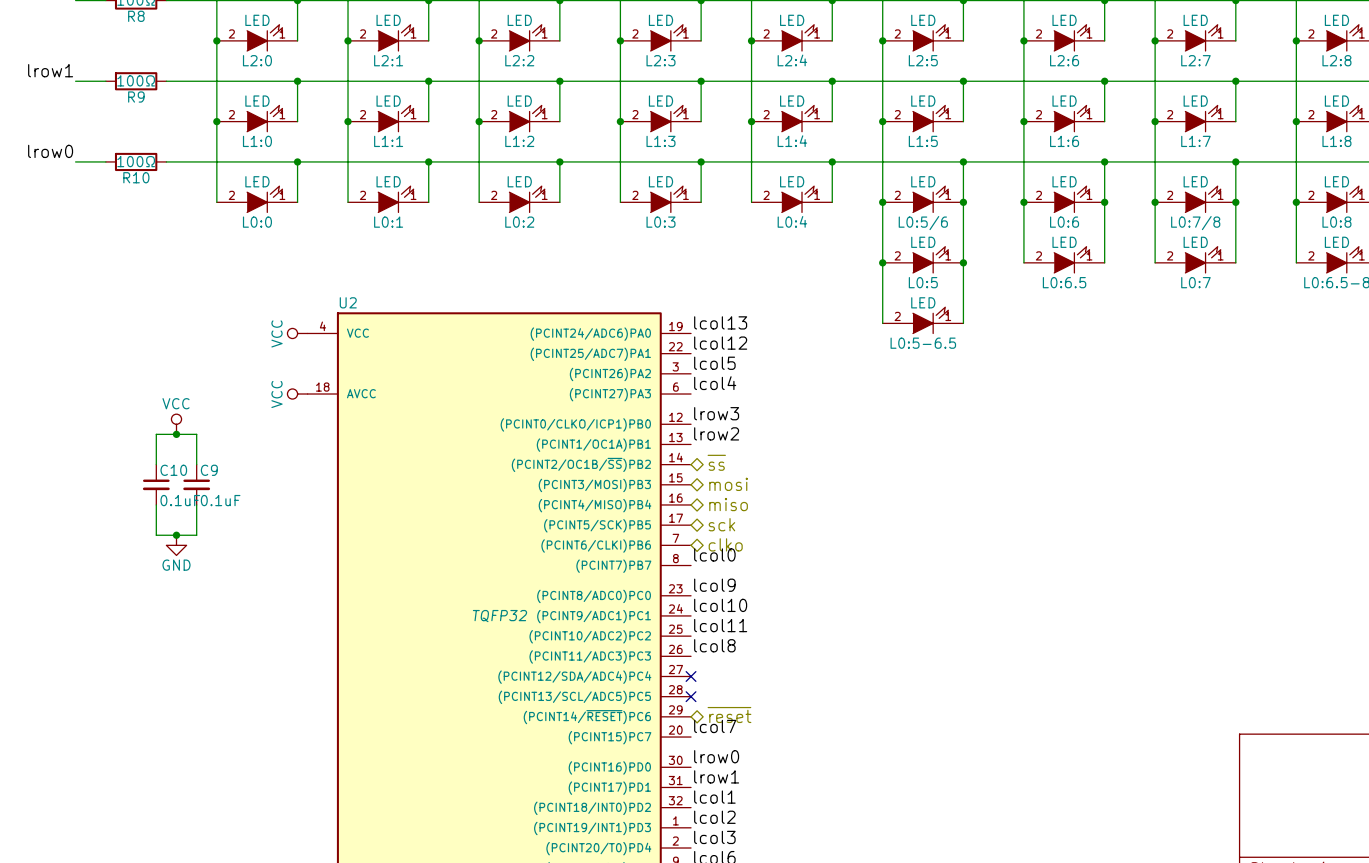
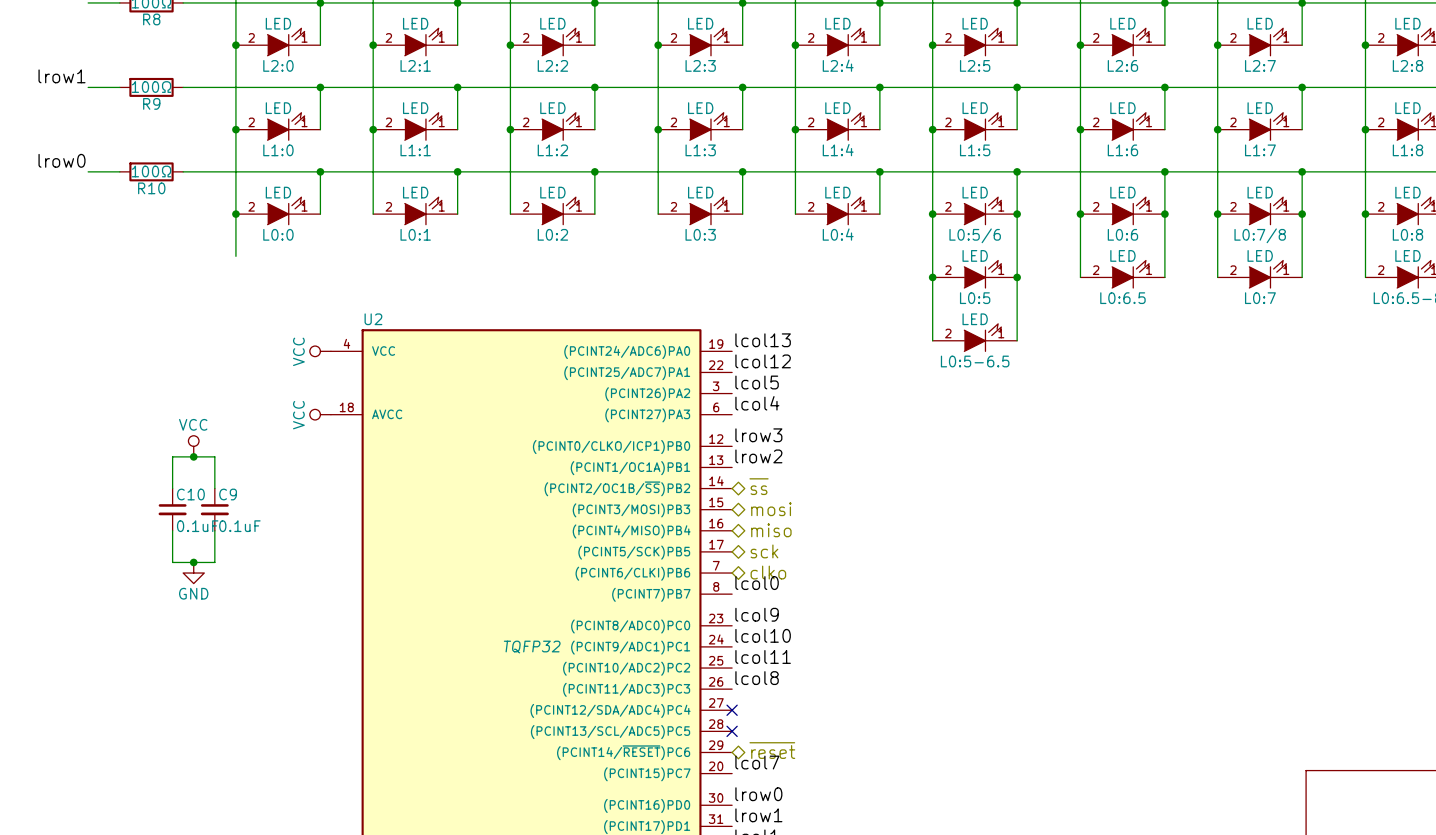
wire: none -> (235, 214) (235, 256)
junction: none -> (235, 214)

